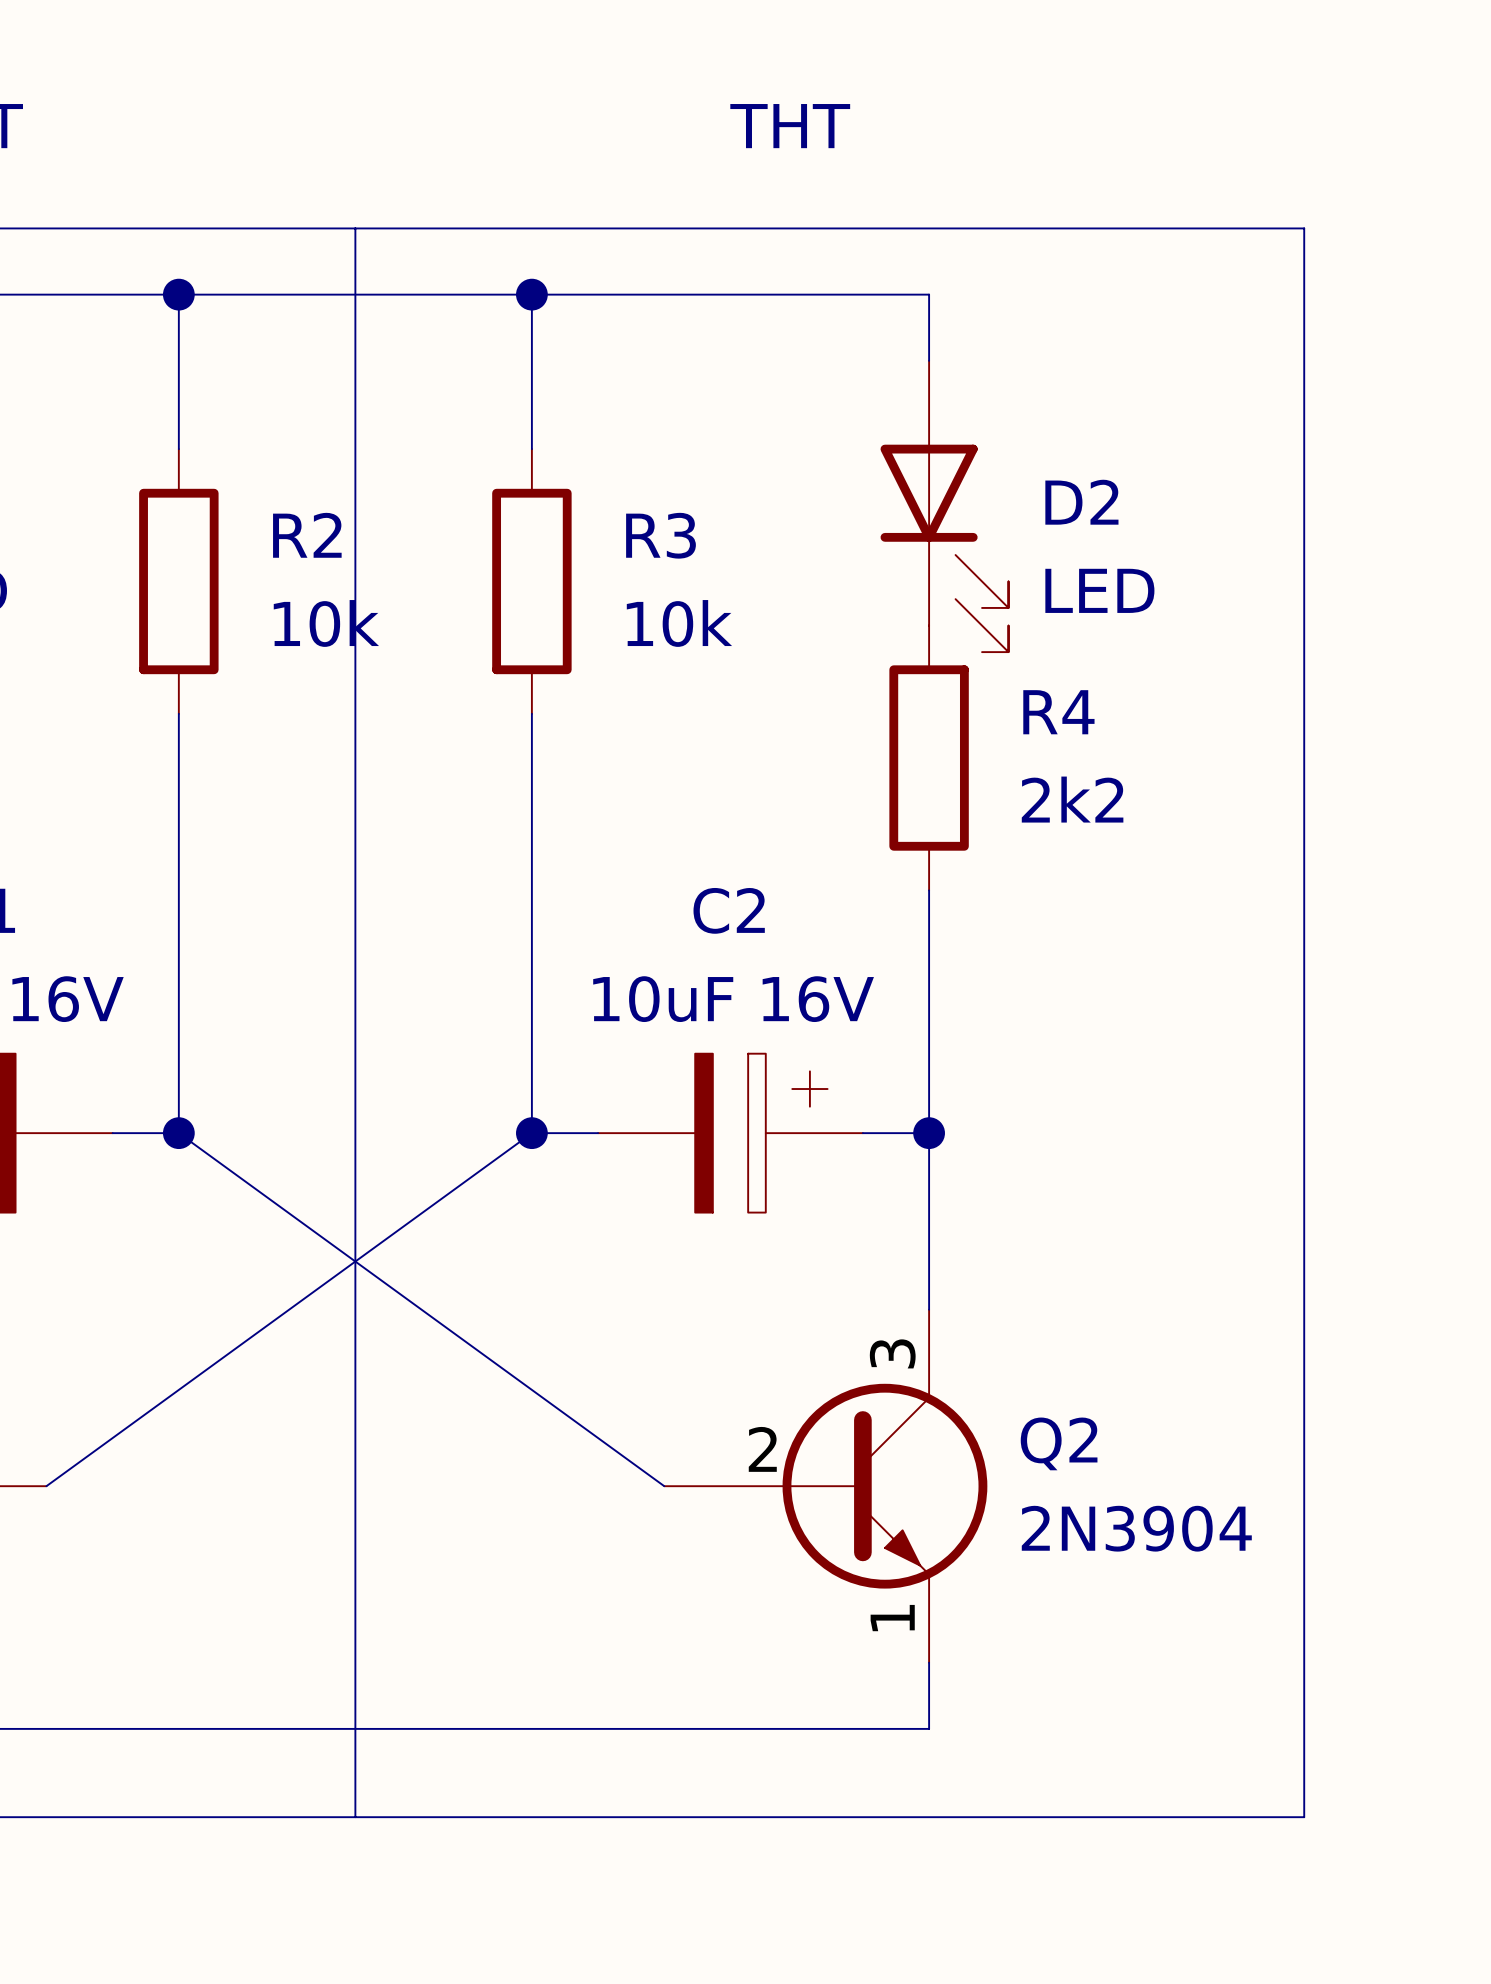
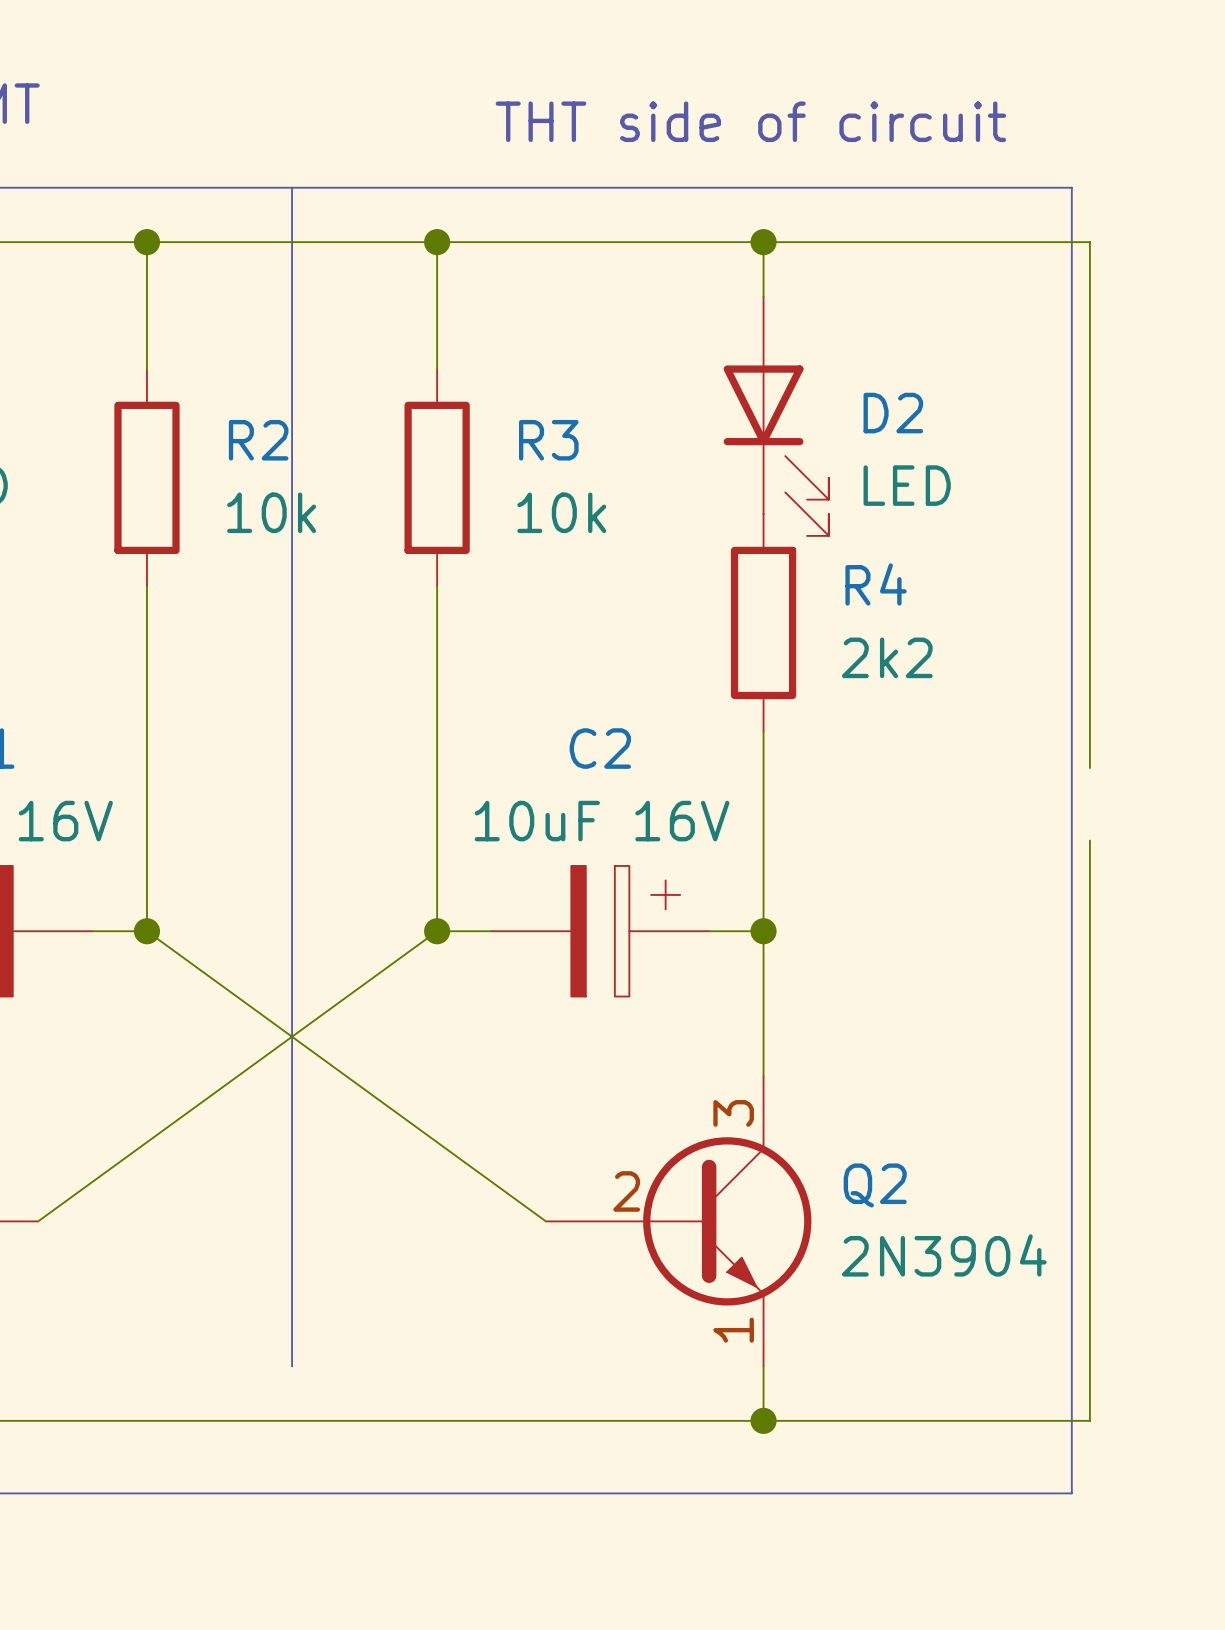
text: THT (790, 126) -> none
text: none -> THT side of circuit (750, 121)
wire: none -> (763, 242) (1089, 242) (1089, 768)
junction: none -> (763, 242)
wire: none -> (1089, 840) (1089, 1420) (763, 1420)
line: (355, 1662) (355, 1817) -> none
junction: none -> (763, 1420)

